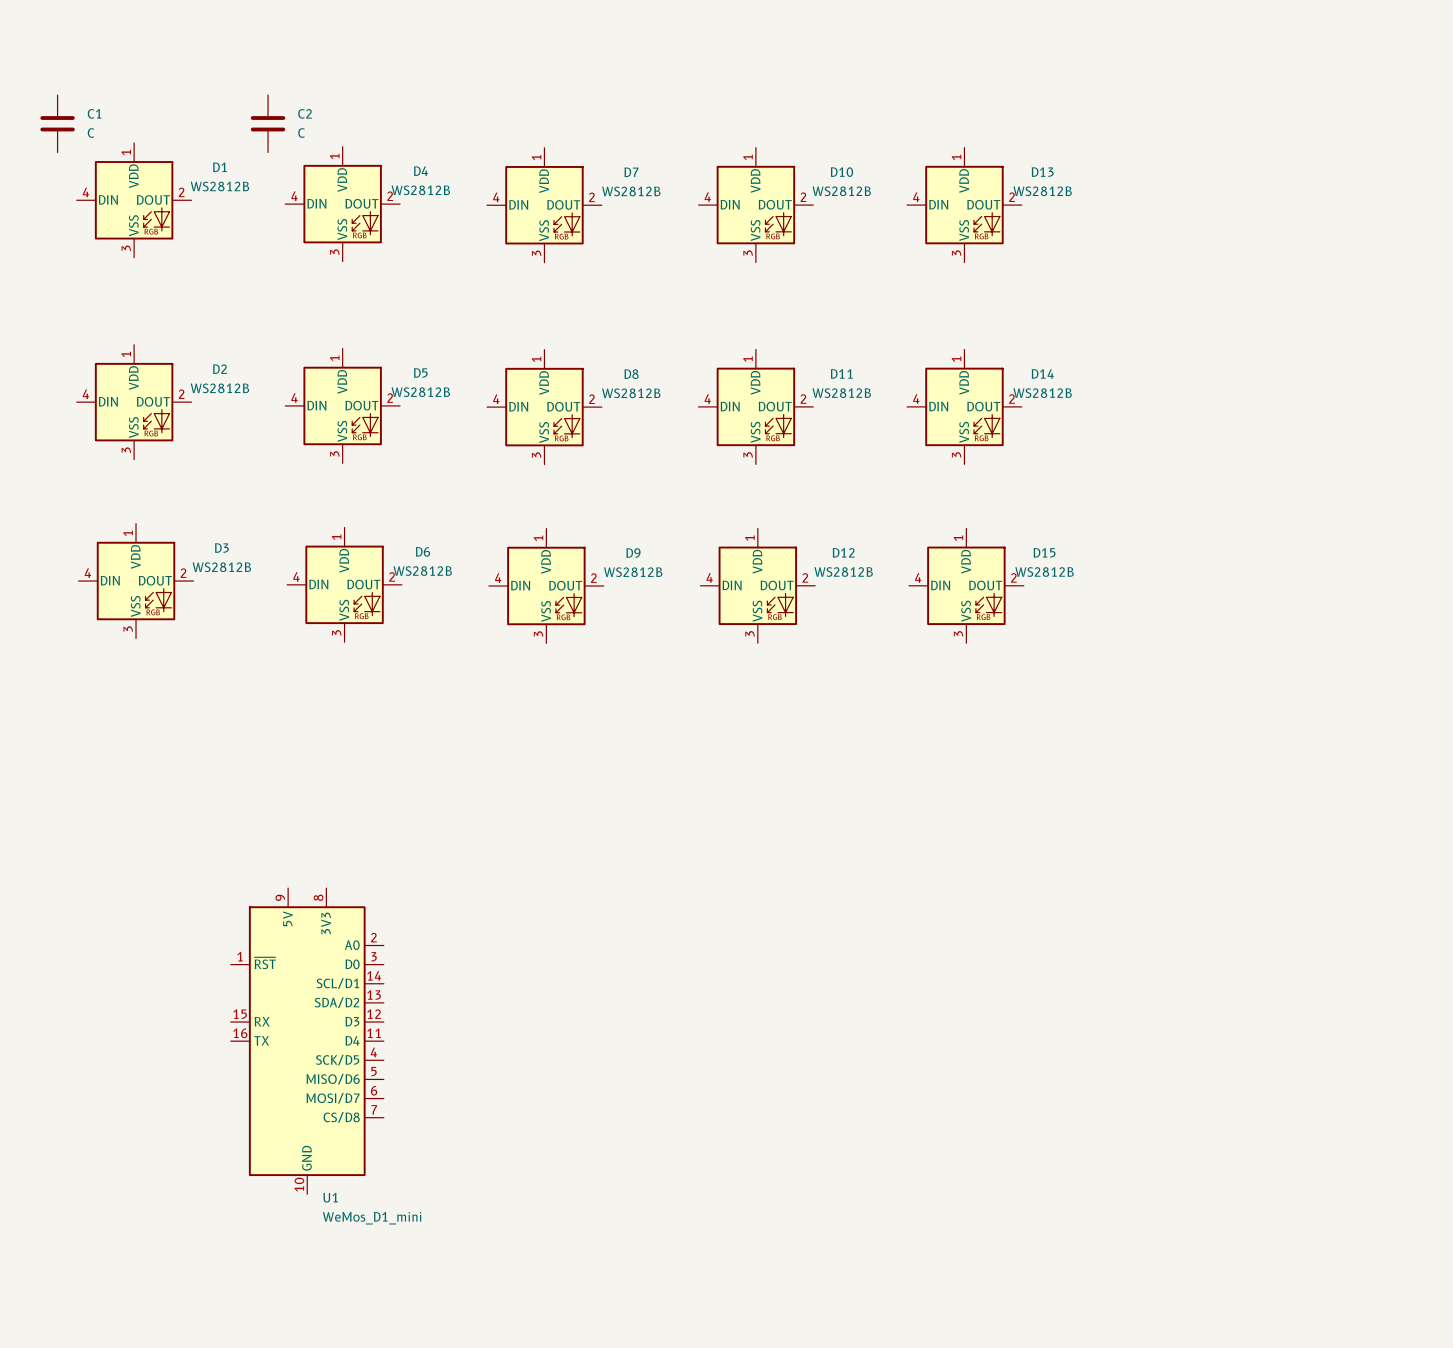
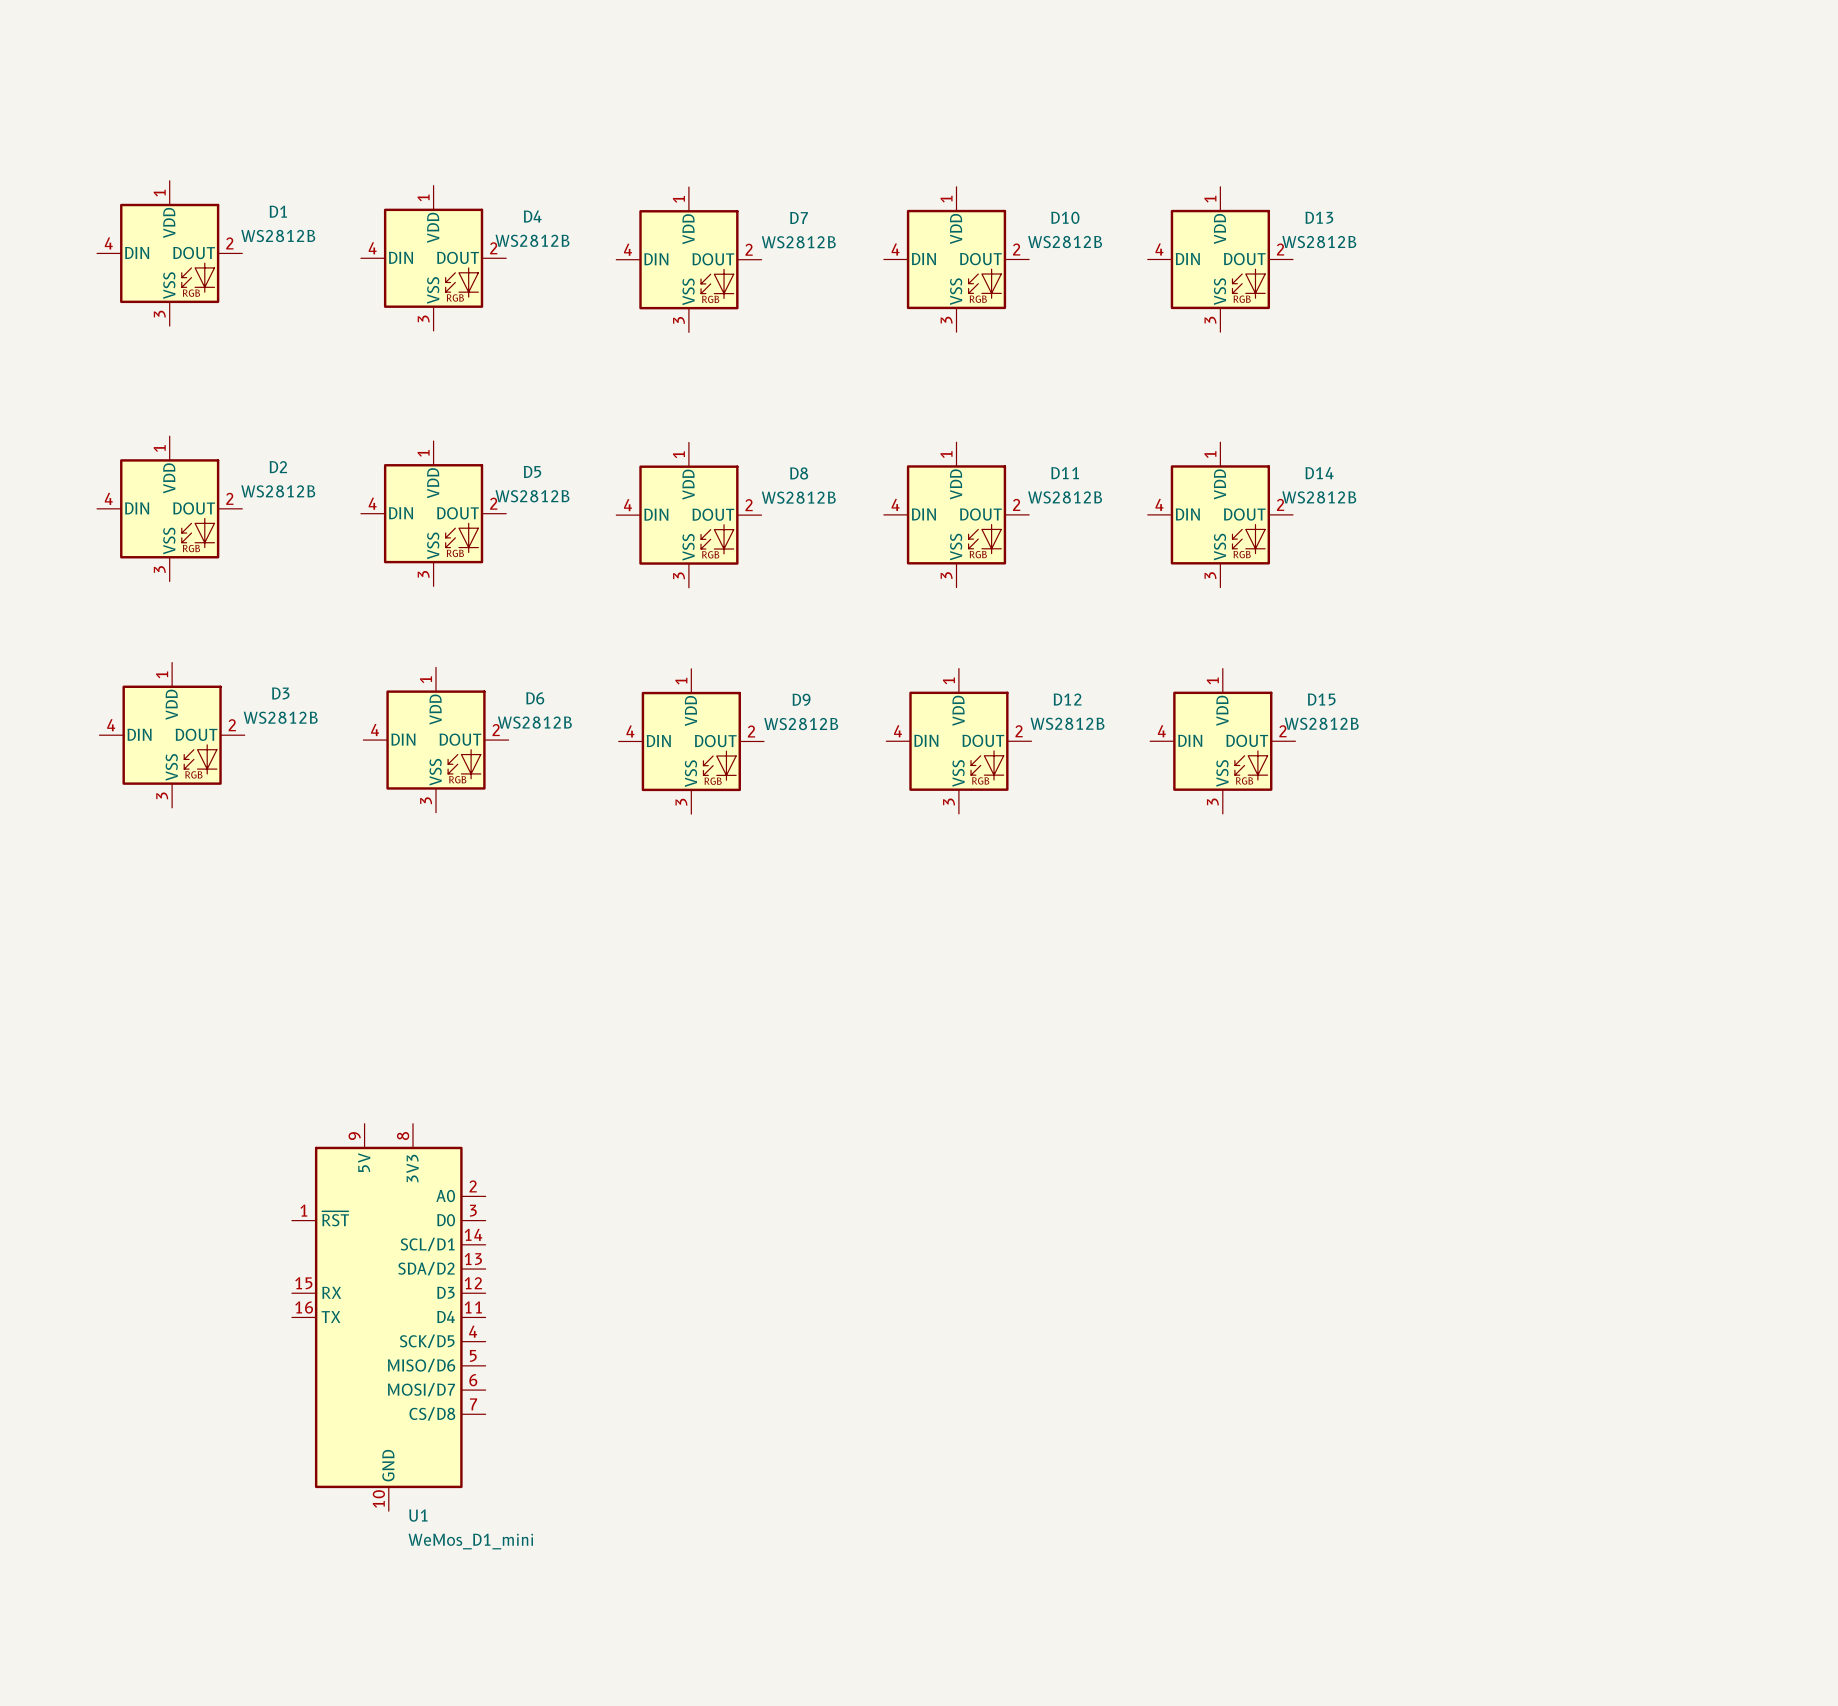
C1: C (57, 123) -> none
C2: C (268, 123) -> none

